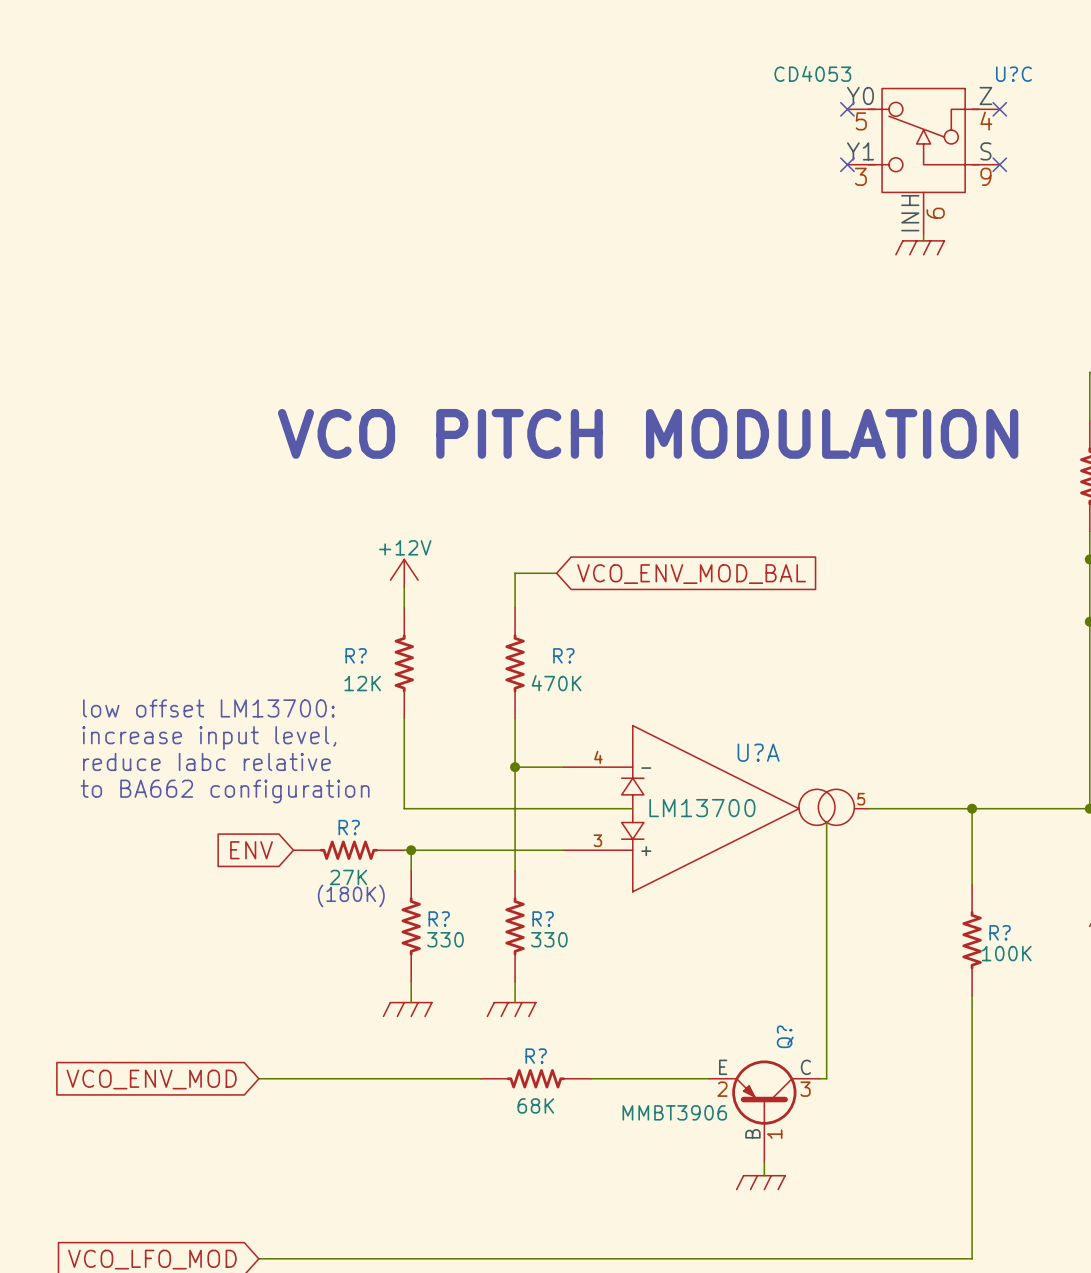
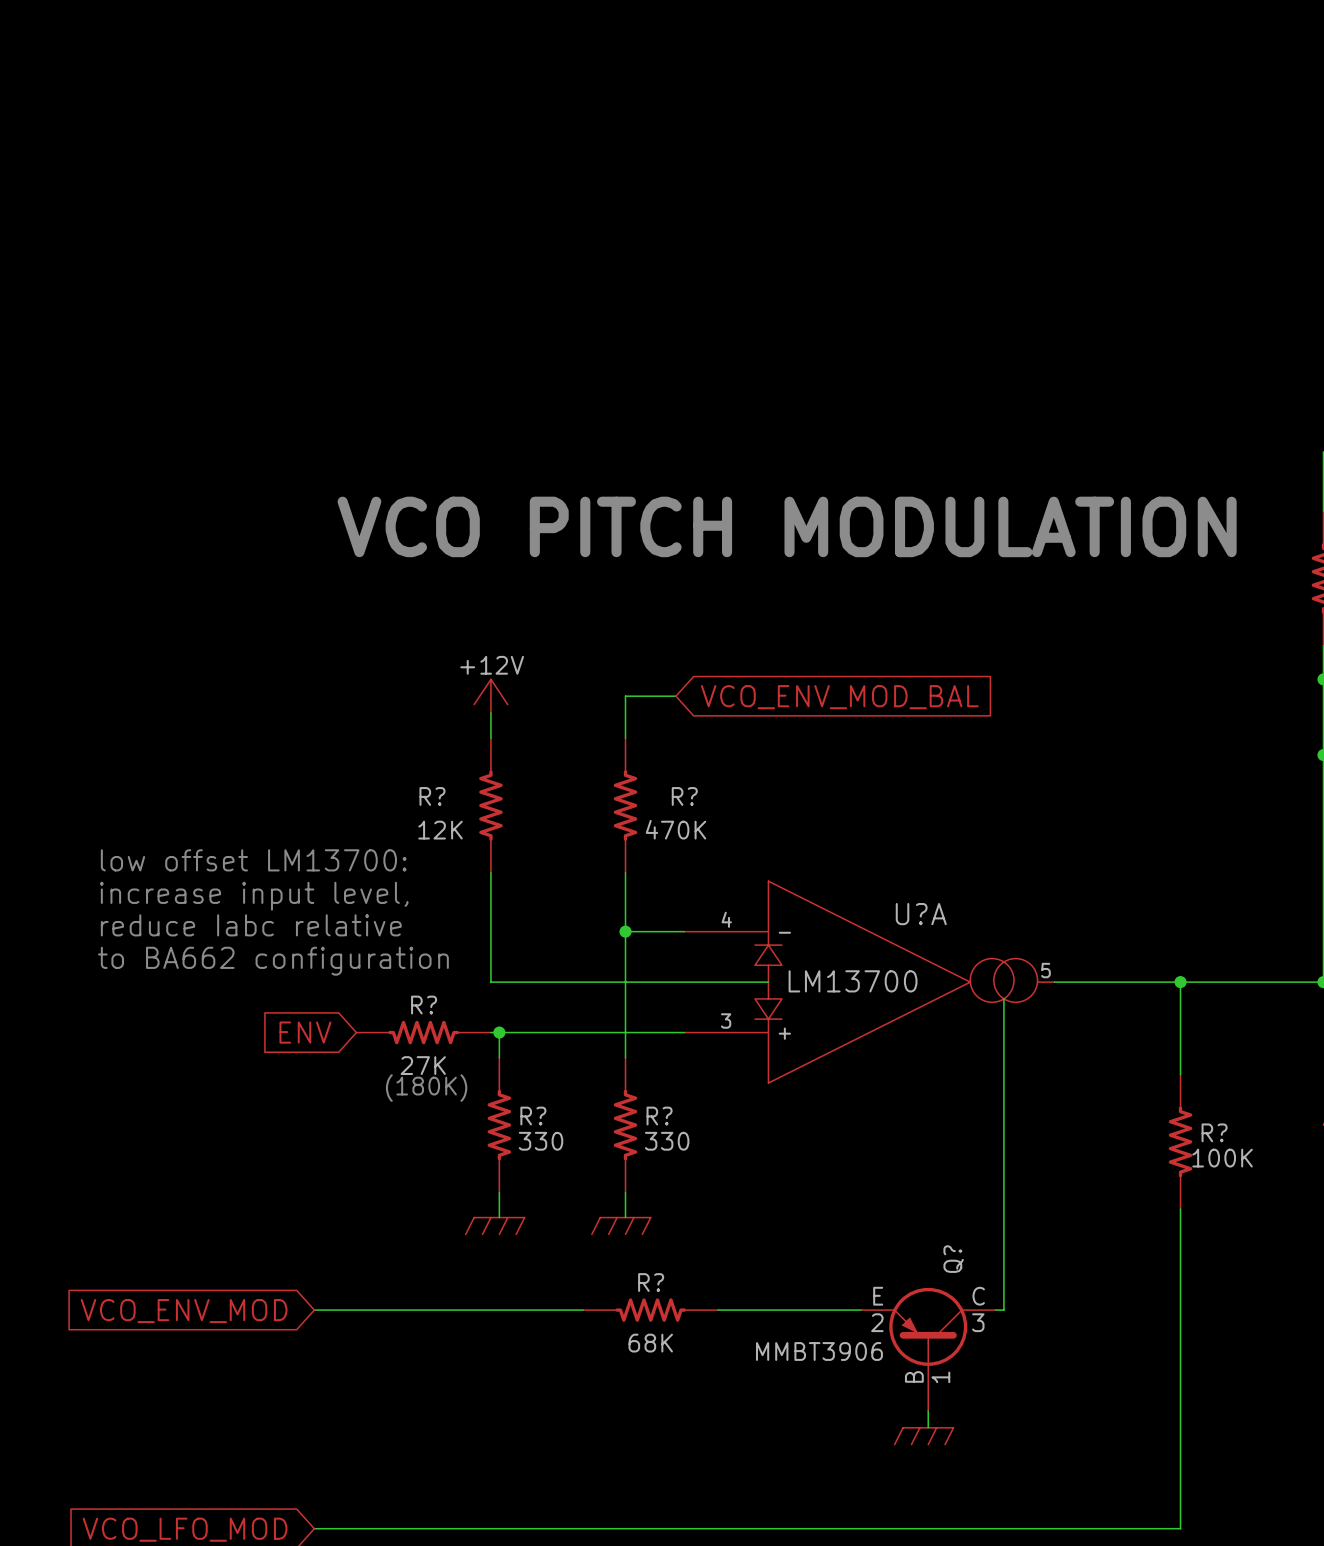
no-connect mark: (847, 109) -> none
no-connect mark: (999, 109) -> none
U?C: CD4053 (923, 161) -> none
no-connect mark: (847, 164) -> none
no-connect mark: (999, 164) -> none
wire: (923, 233) (923, 240) -> none
power symbol: (920, 247) -> none

